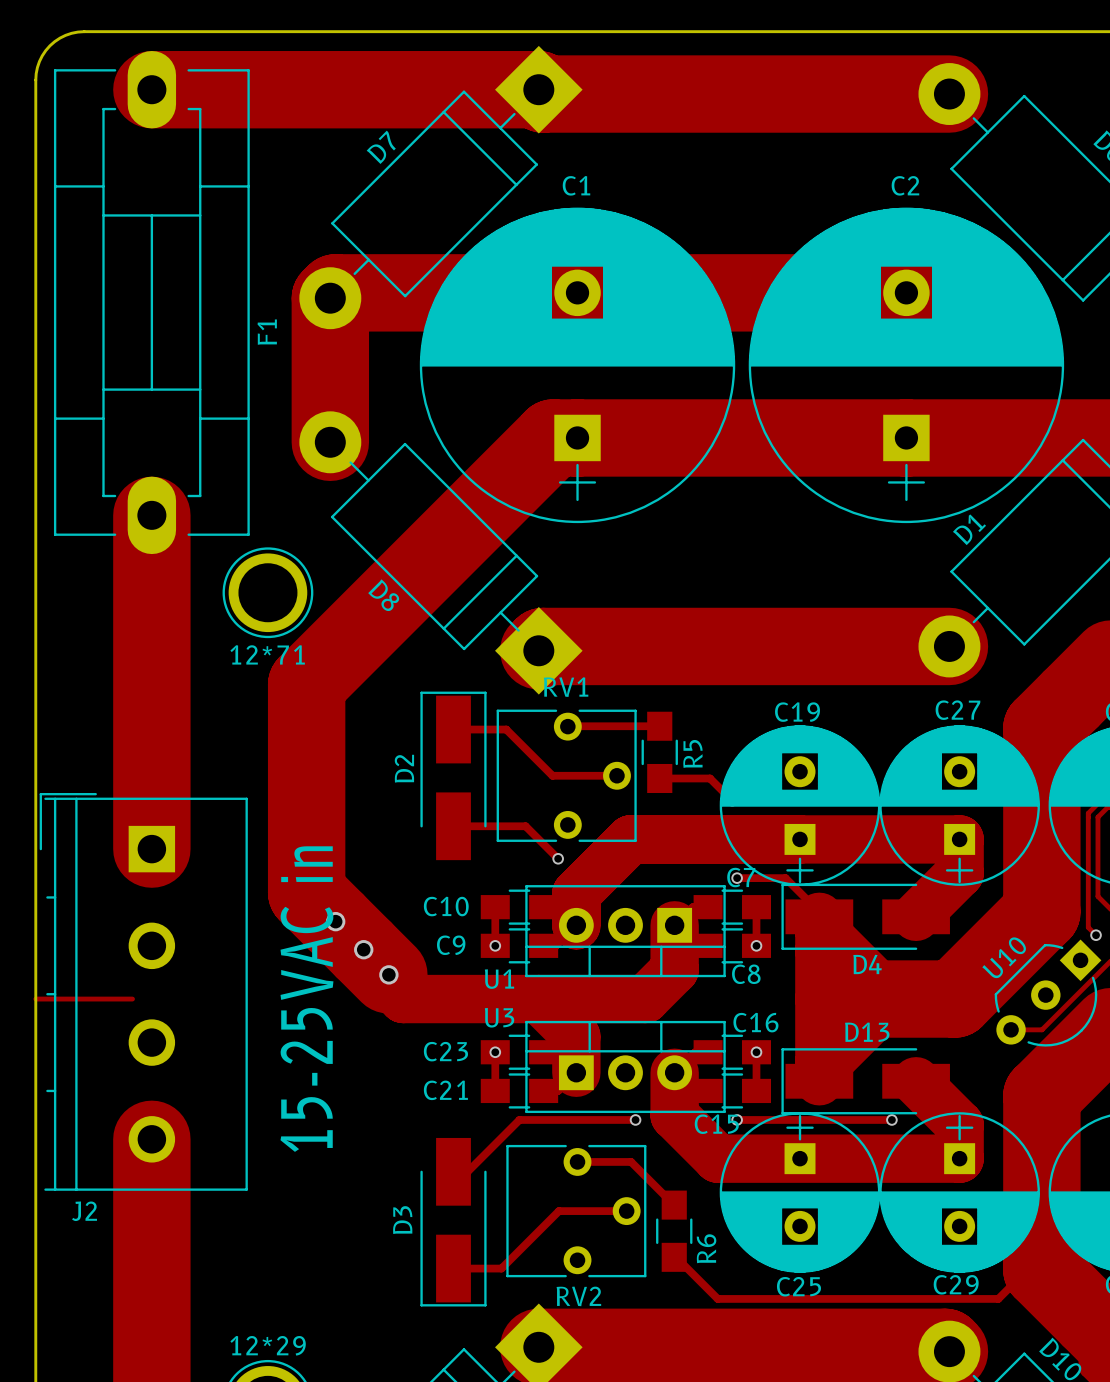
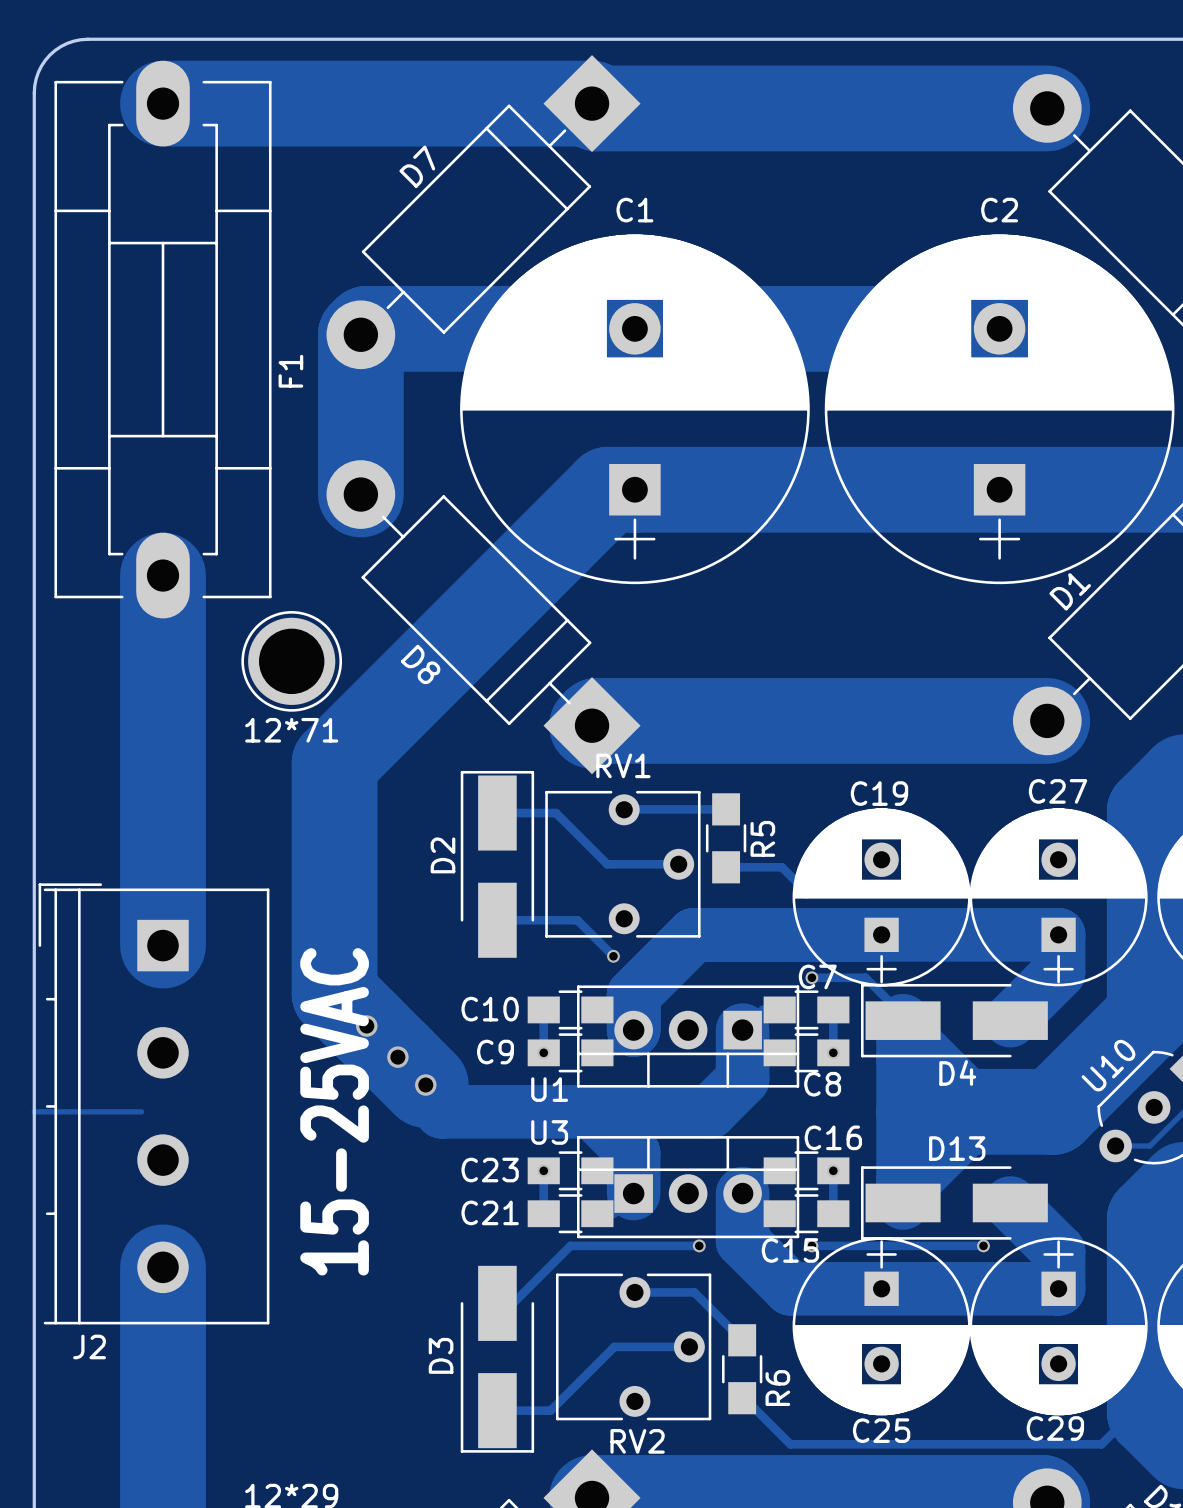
text: 15-25VAC in (306, 999) -> 15-25VAC (334, 1111)

